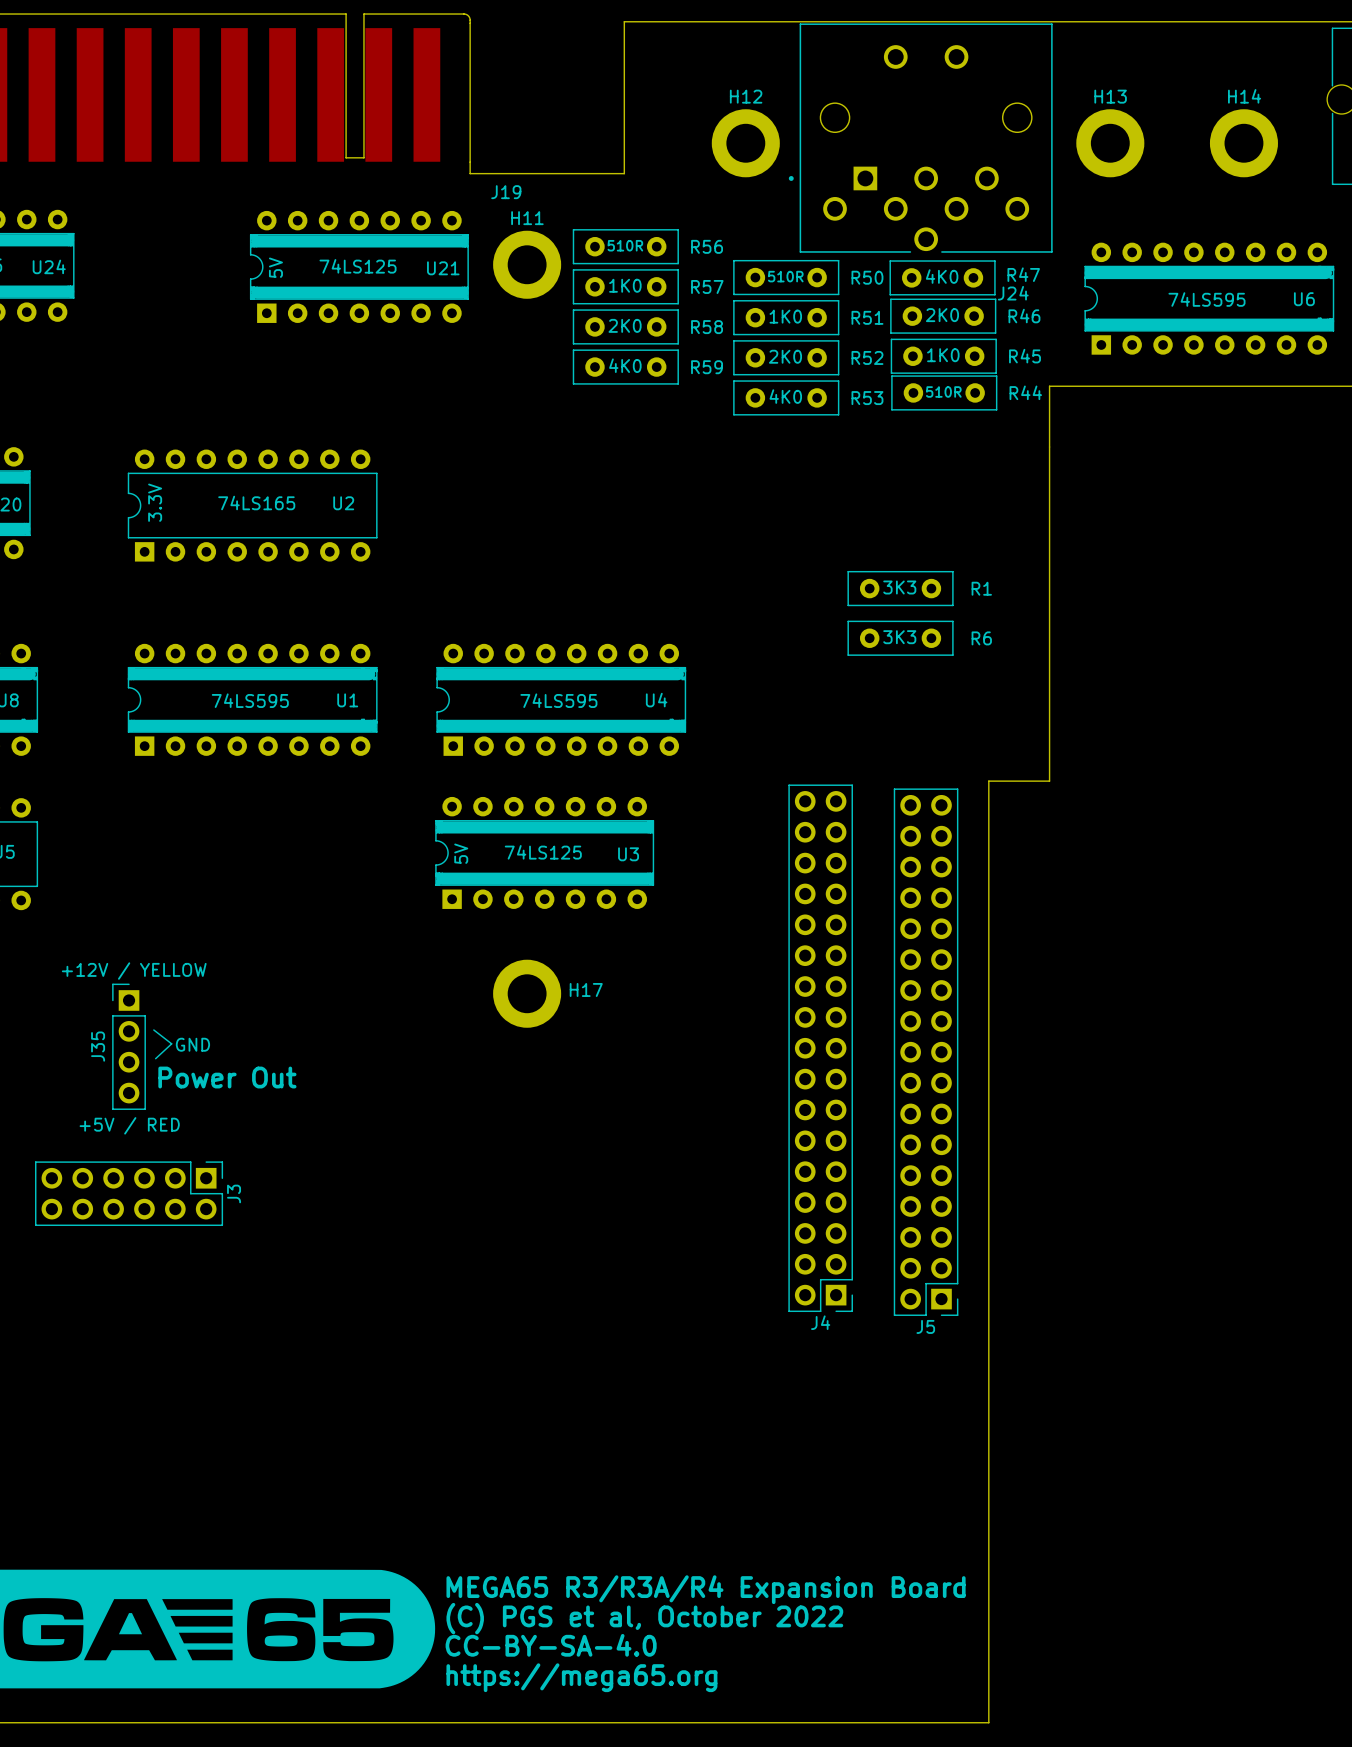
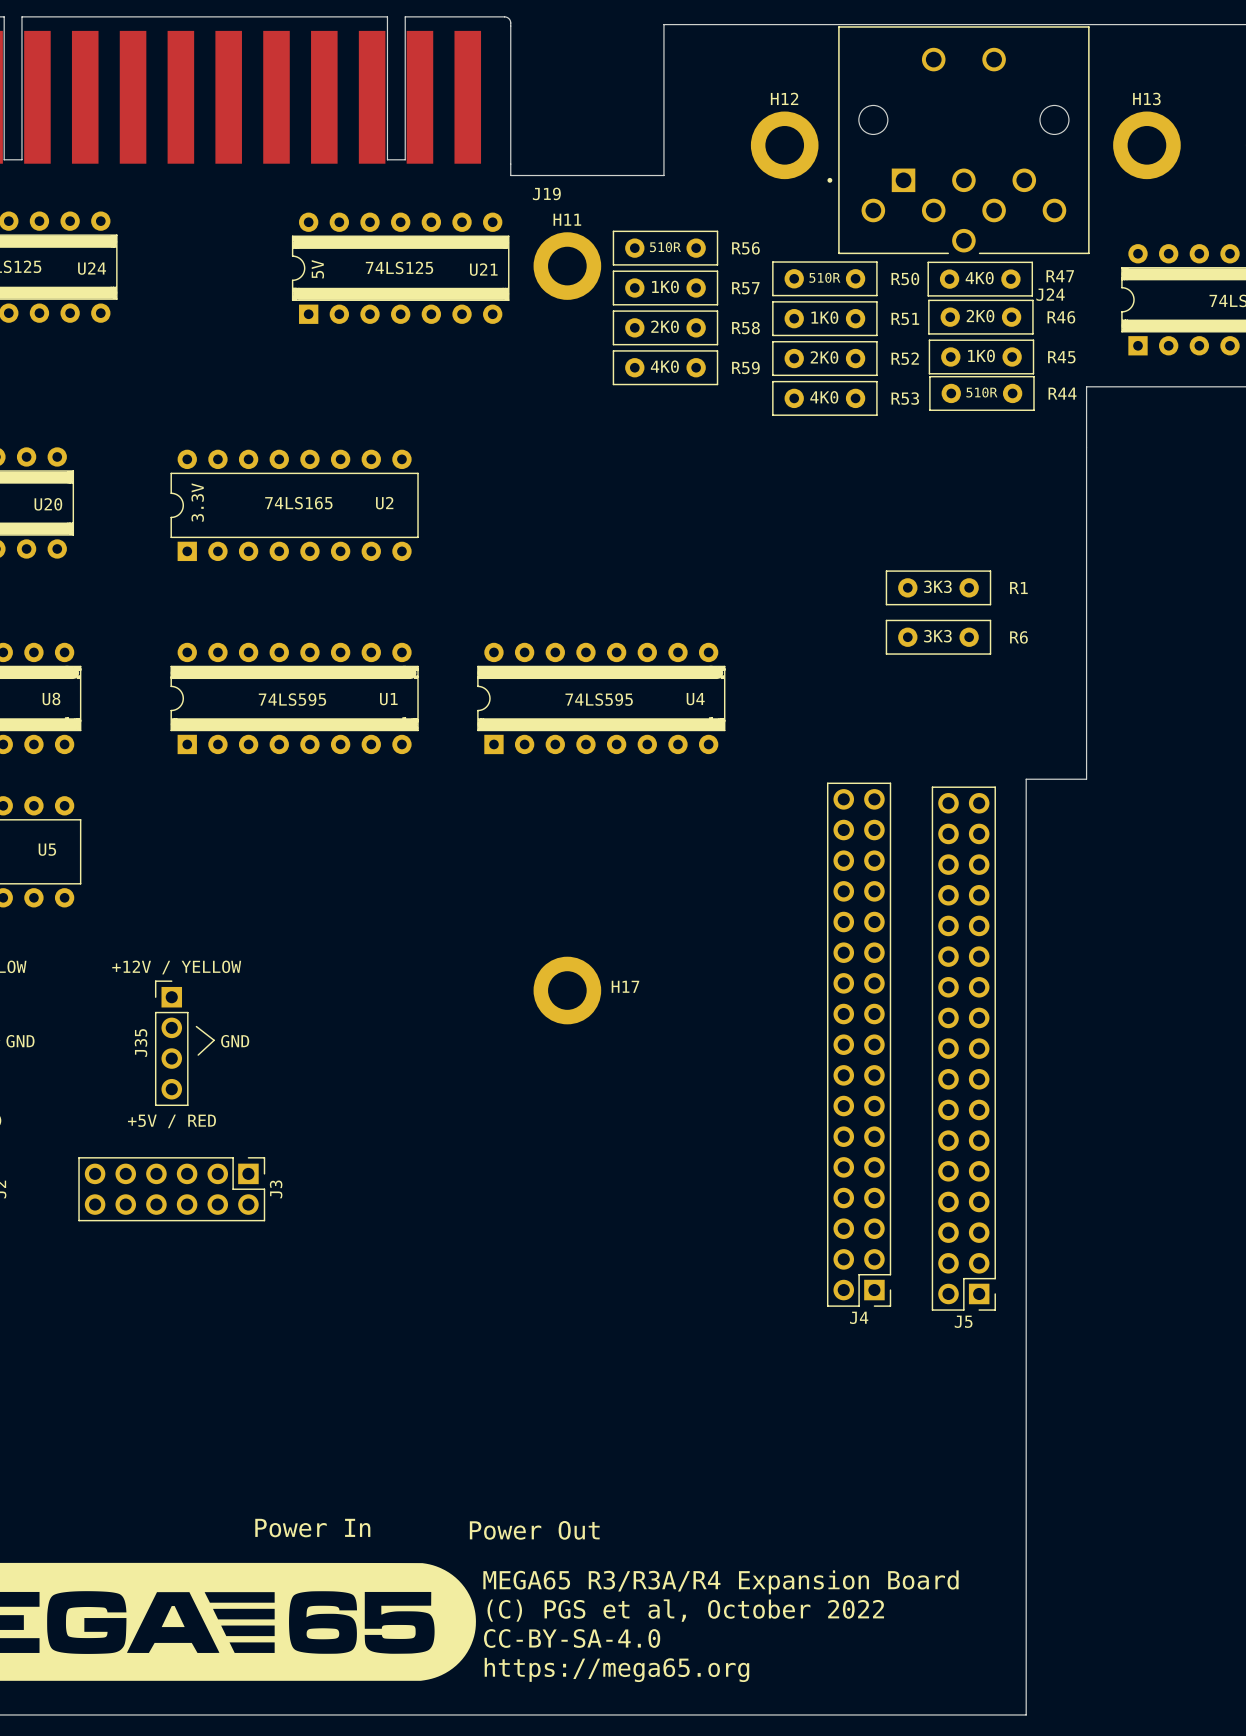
U3: 74LS125 (544, 852) -> none
text: Power Out (227, 1077) -> none
text: none -> Power In (312, 1528)
text: none -> Power Out (534, 1530)

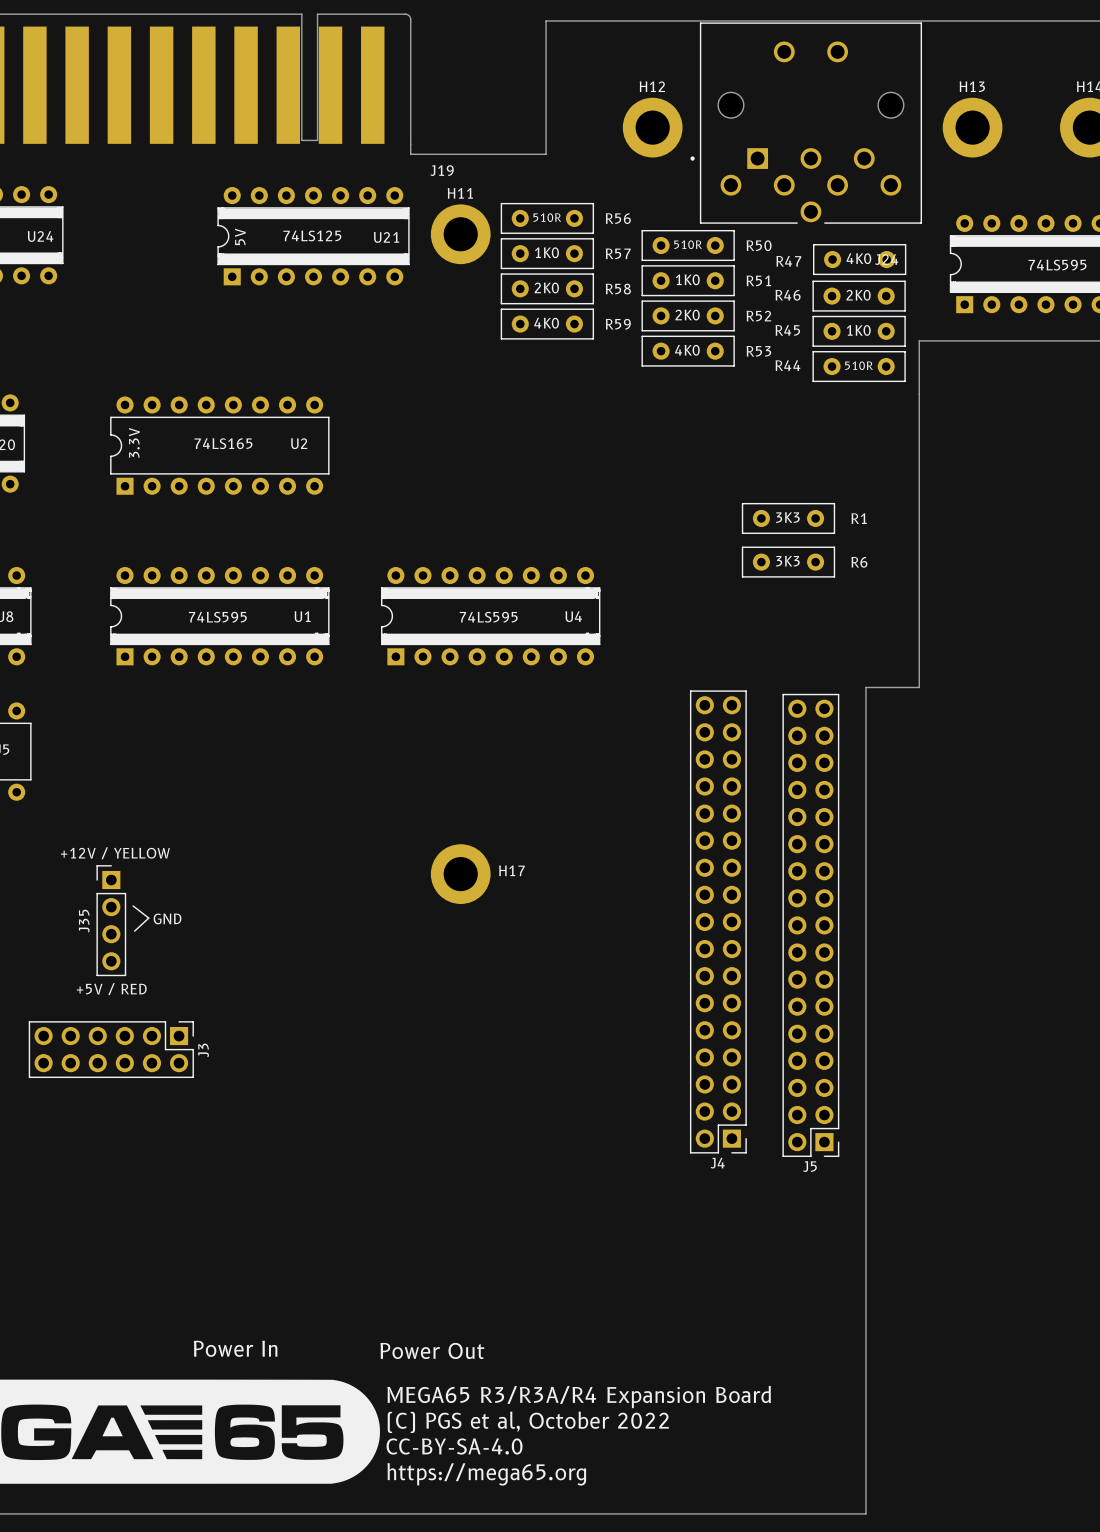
R47 name position: R47 (1060, 276) -> R47 (788, 261)
R47 position: (980, 279) -> (859, 259)
R46 position: (980, 317) -> (859, 296)
R46 name position: R46 (1061, 317) -> R46 (788, 295)
R45 position: (981, 357) -> (859, 331)
R45 name position: R45 (1061, 357) -> R45 (787, 330)
R44 position: (981, 393) -> (859, 366)
R44 name position: R44 (1062, 393) -> R44 (787, 365)

